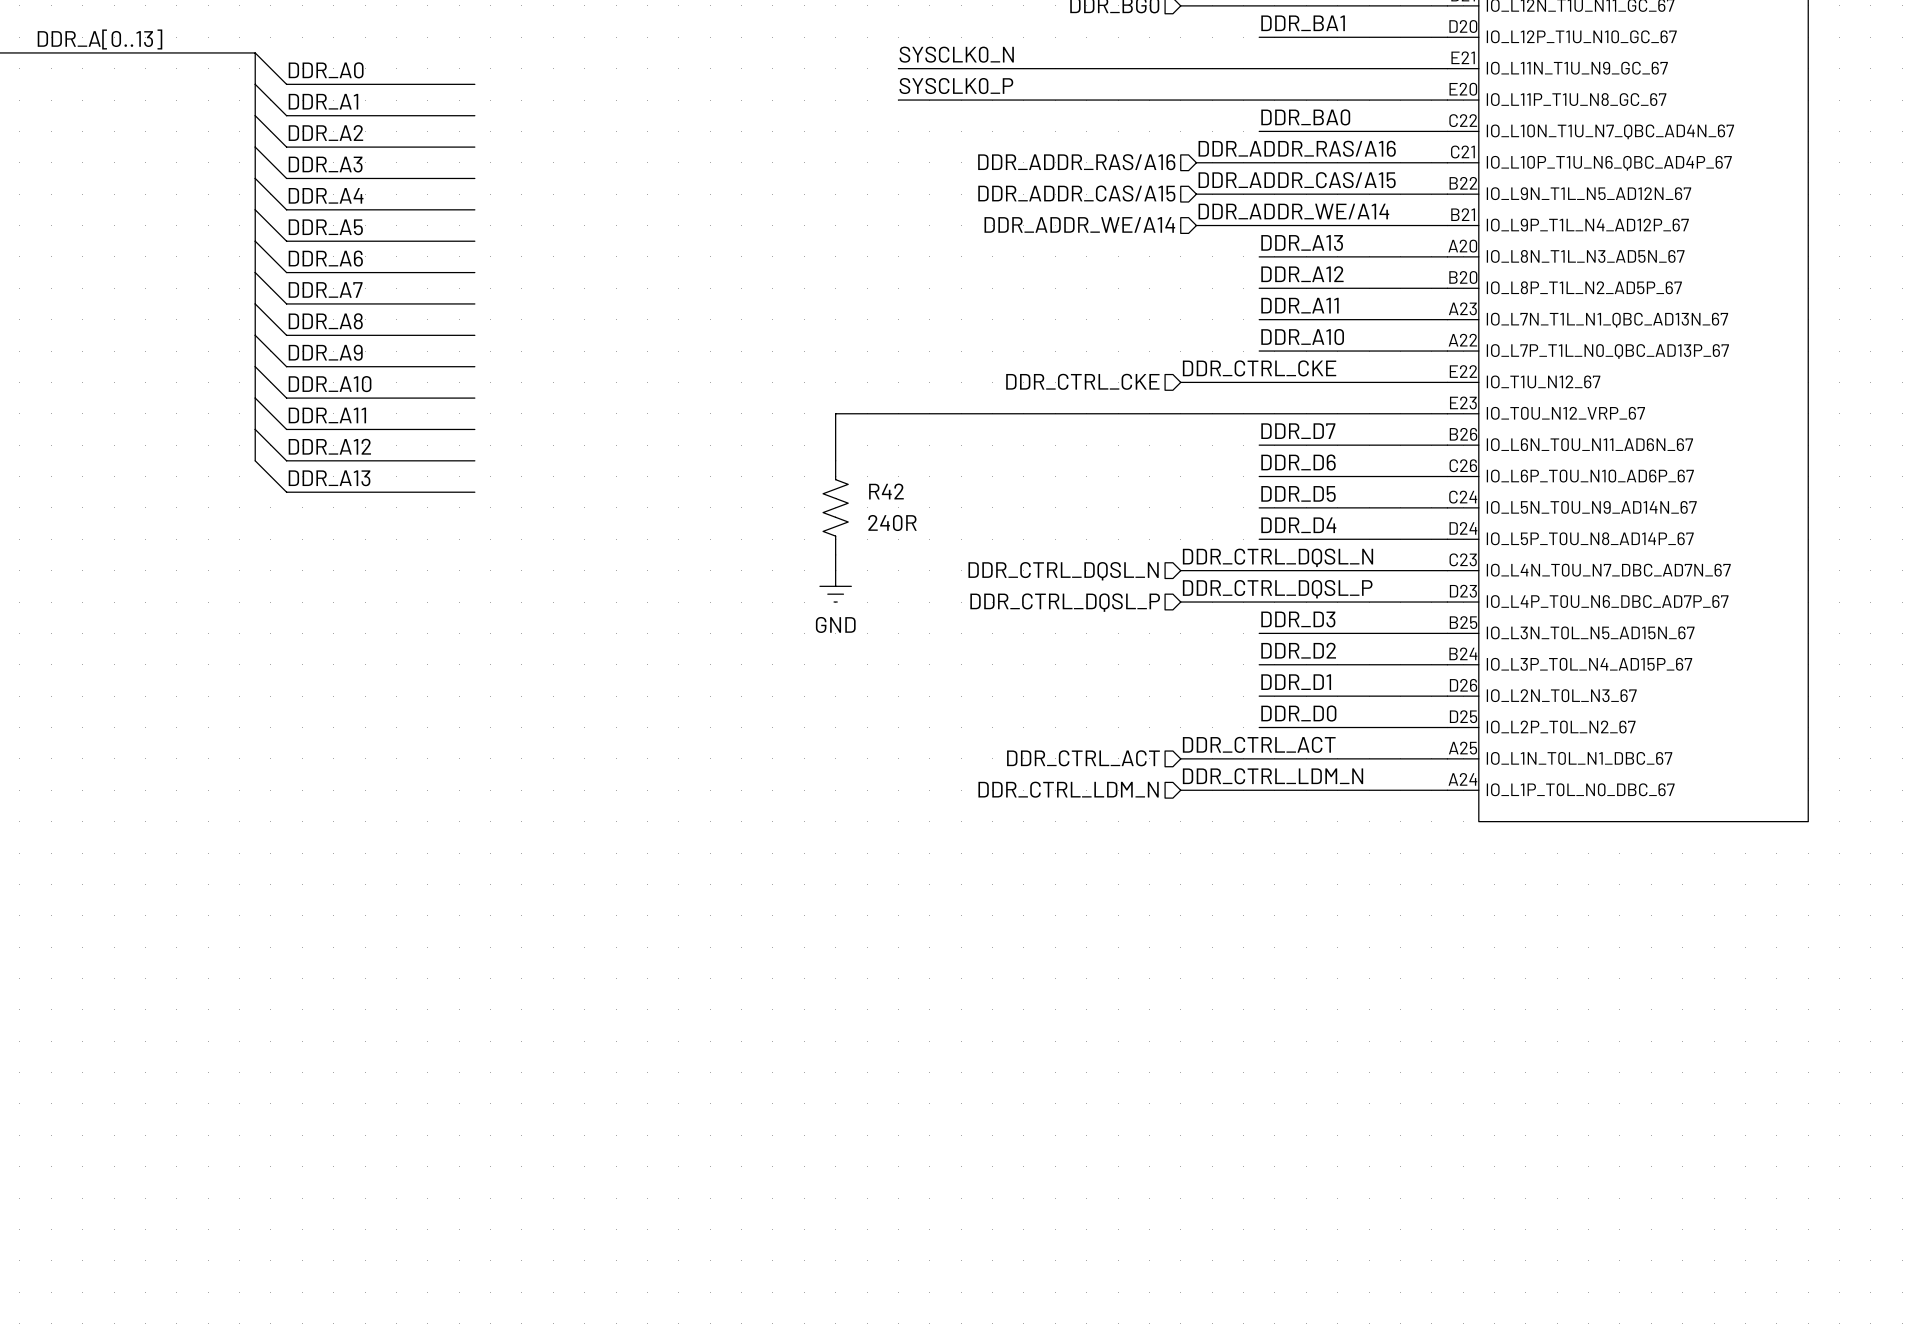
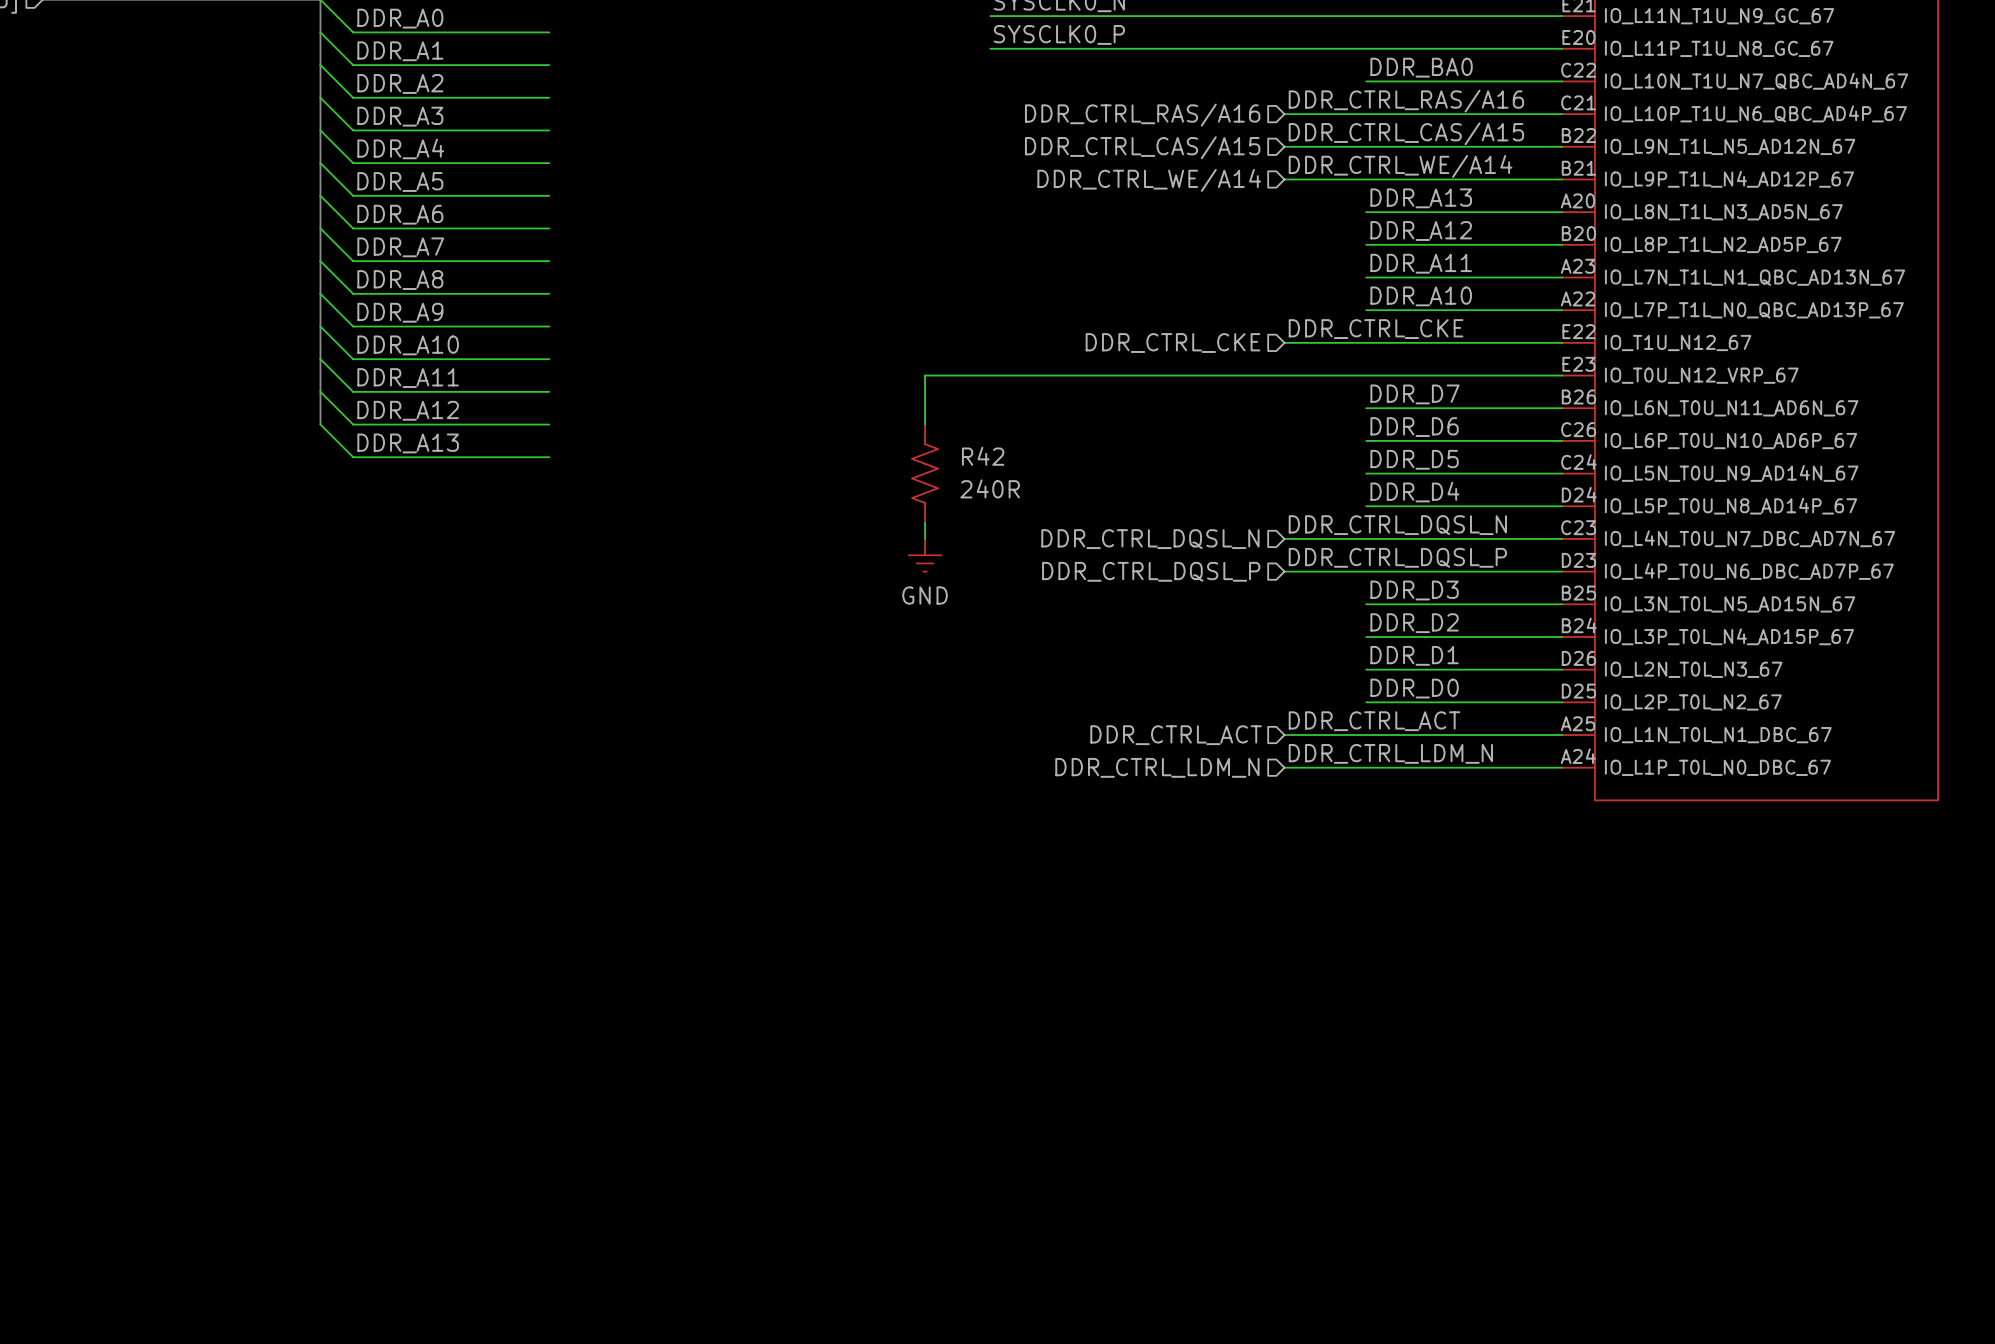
label: DDR_ADDR_RAS/A16 (1297, 148) -> DDR_CTRL_RAS/A16 (1406, 101)
hierarchical label: DDR_ADDR_RAS/A16 (1076, 162) -> DDR_CTRL_RAS/A16 (1142, 115)
wire: none -> (1284, 114) (1300, 114)
label: DDR_ADDR_CAS/A15 (1297, 180) -> DDR_CTRL_CAS/A15 (1406, 133)
hierarchical label: DDR_ADDR_CAS/A15 (1076, 193) -> DDR_CTRL_CAS/A15 (1142, 147)
wire: none -> (1284, 146) (1300, 146)
label: DDR_ADDR_WE/A14 (1293, 211) -> DDR_CTRL_WE/A14 (1400, 166)
hierarchical label: DDR_ADDR_WE/A14 (1079, 224) -> DDR_CTRL_WE/A14 (1149, 180)
wire: none -> (1284, 179) (1300, 179)

